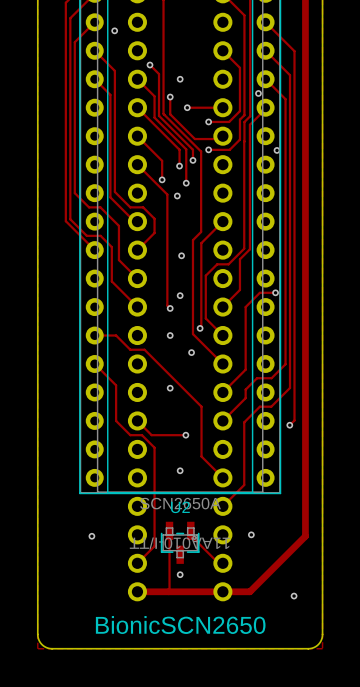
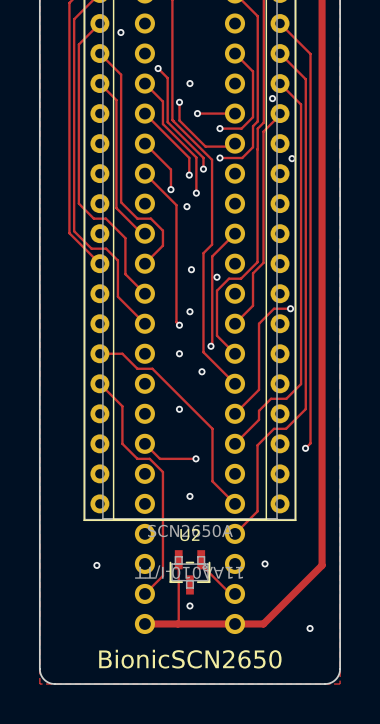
via: none -> (216, 277)

